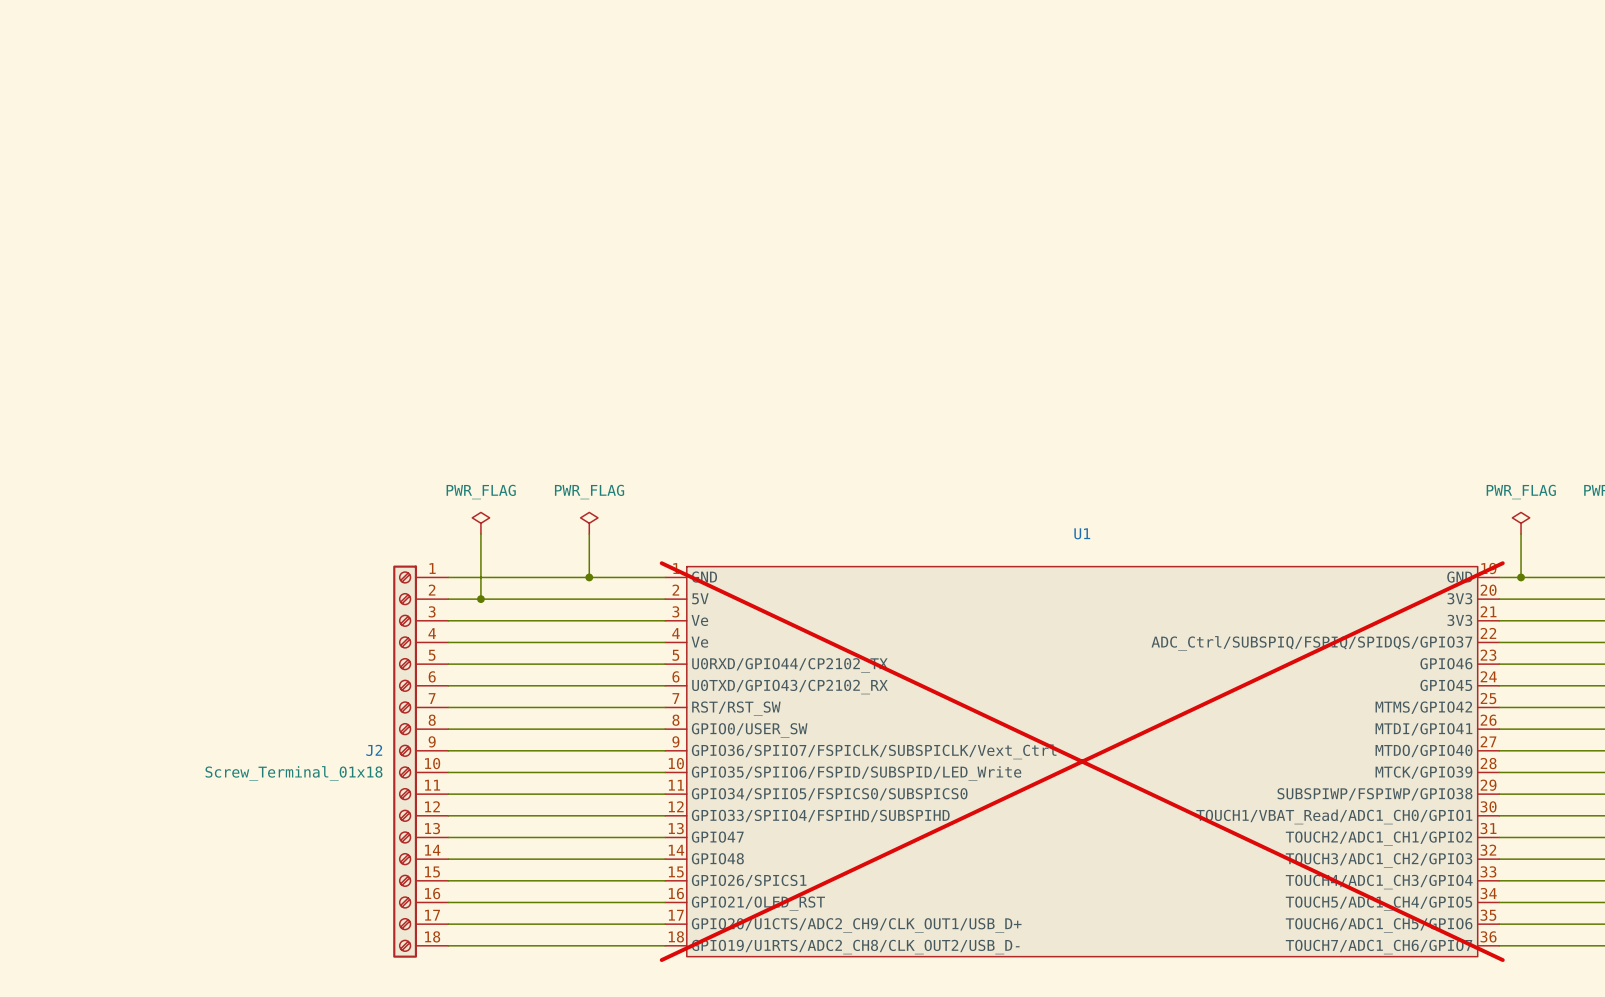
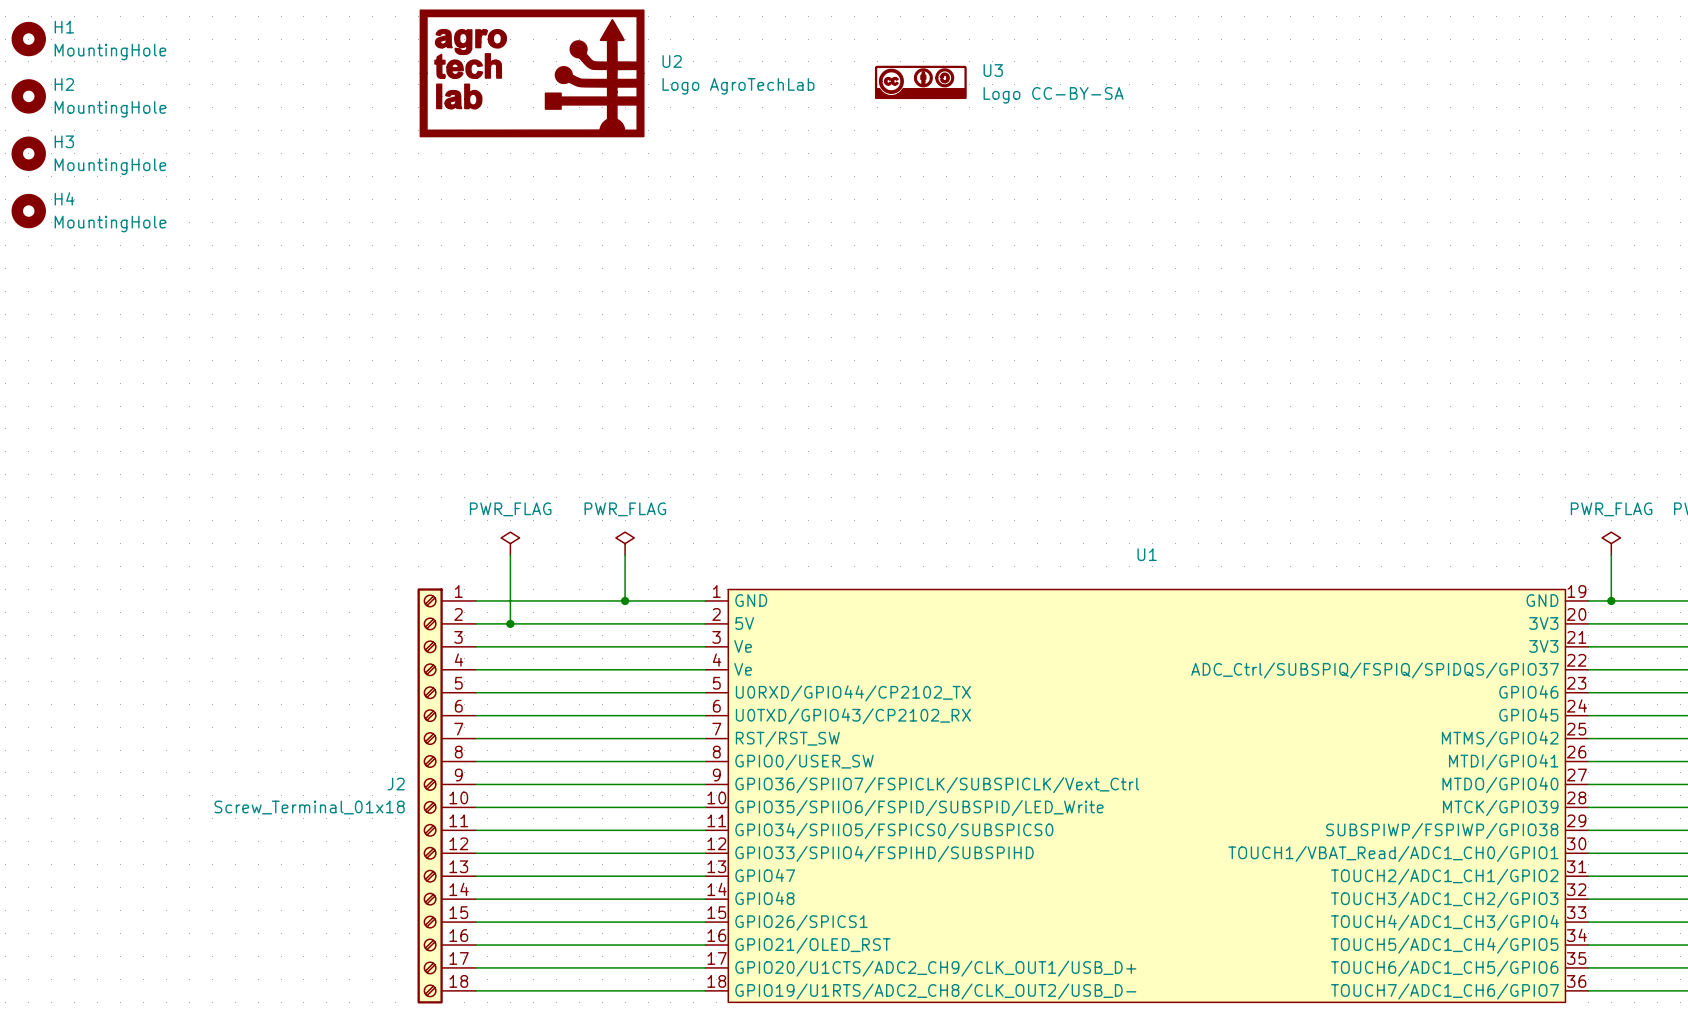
H1: none -> MountingHole (28, 39)
U2: none -> Logo AgroTechLab (532, 73)
U3: none -> Logo CC-BY-SA (920, 82)
H2: none -> MountingHole (28, 96)
H3: none -> MountingHole (28, 153)
H4: none -> MountingHole (28, 211)
U1 do-not-place cross: (1082, 761) -> none

